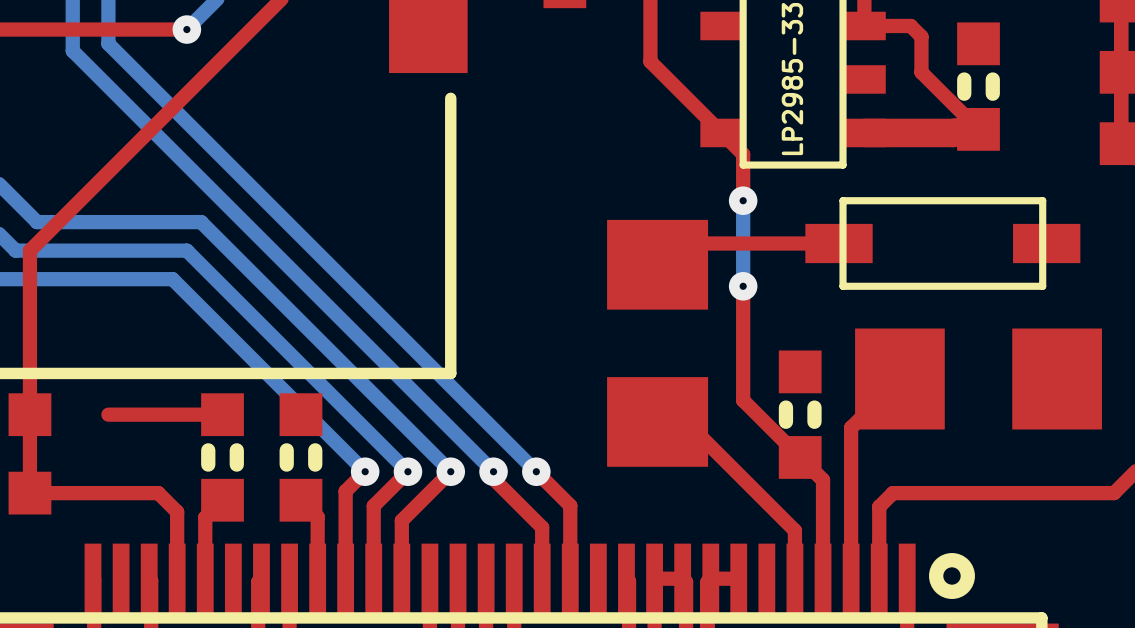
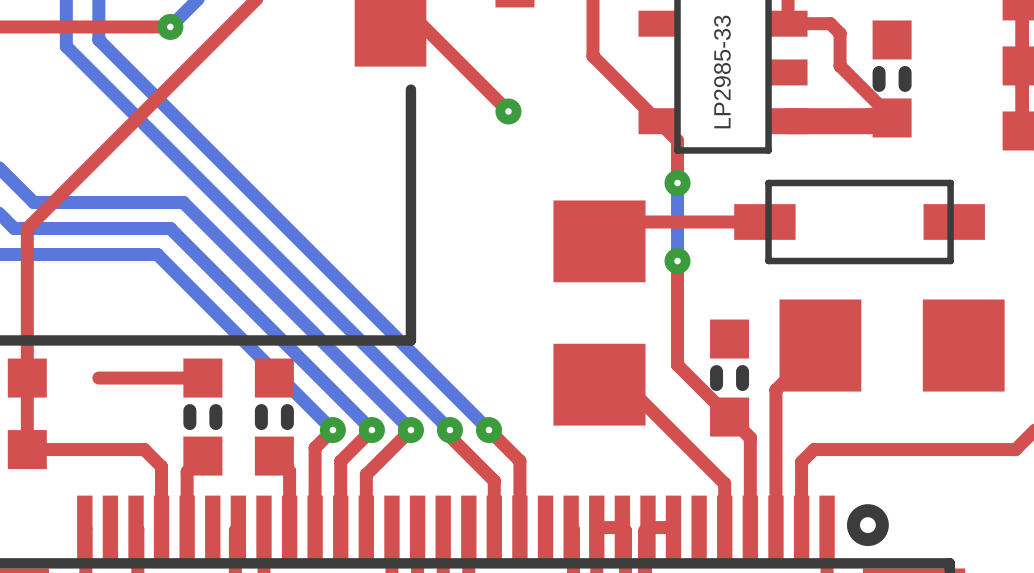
top track: none -> (390, 20) (417, 20) (508, 111)
via: none -> (508, 111)

